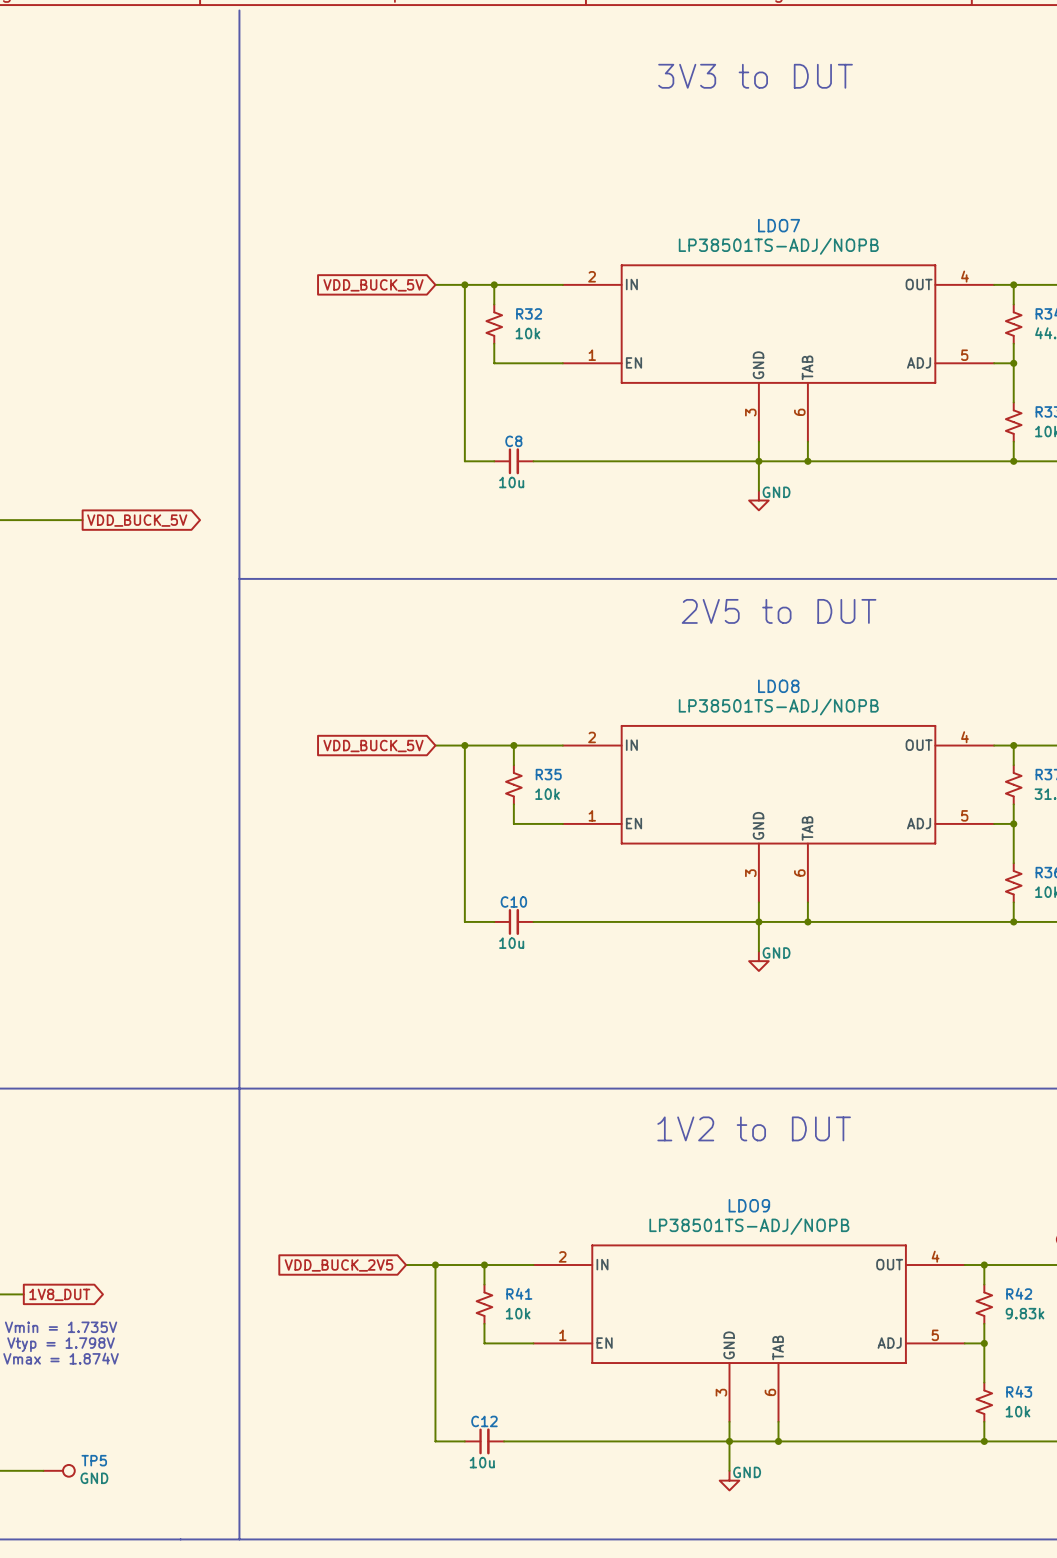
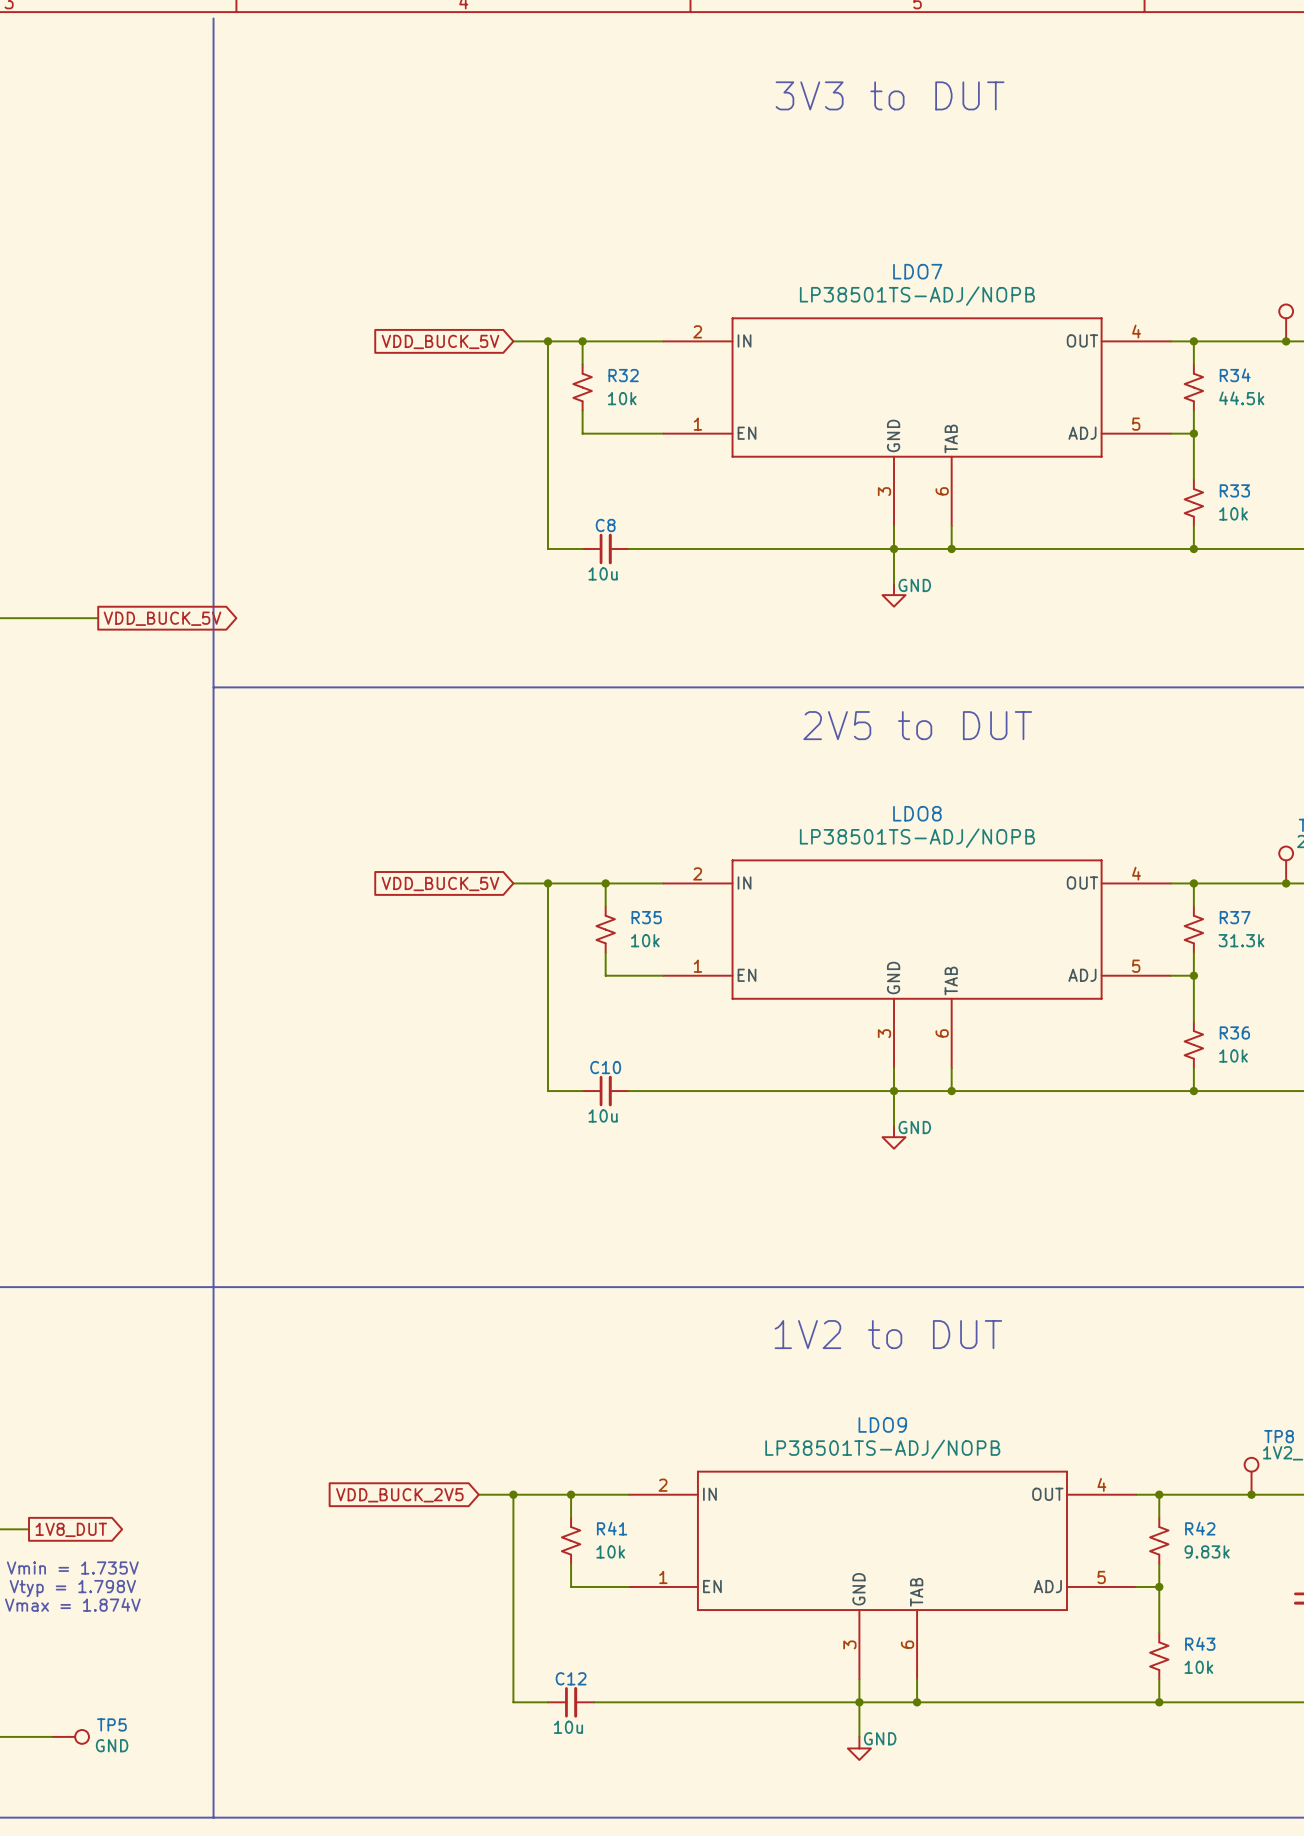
line: (239, 10) (239, 1539) -> (213, 18) (213, 1817)
line: none -> (213, 687) (282, 687)

